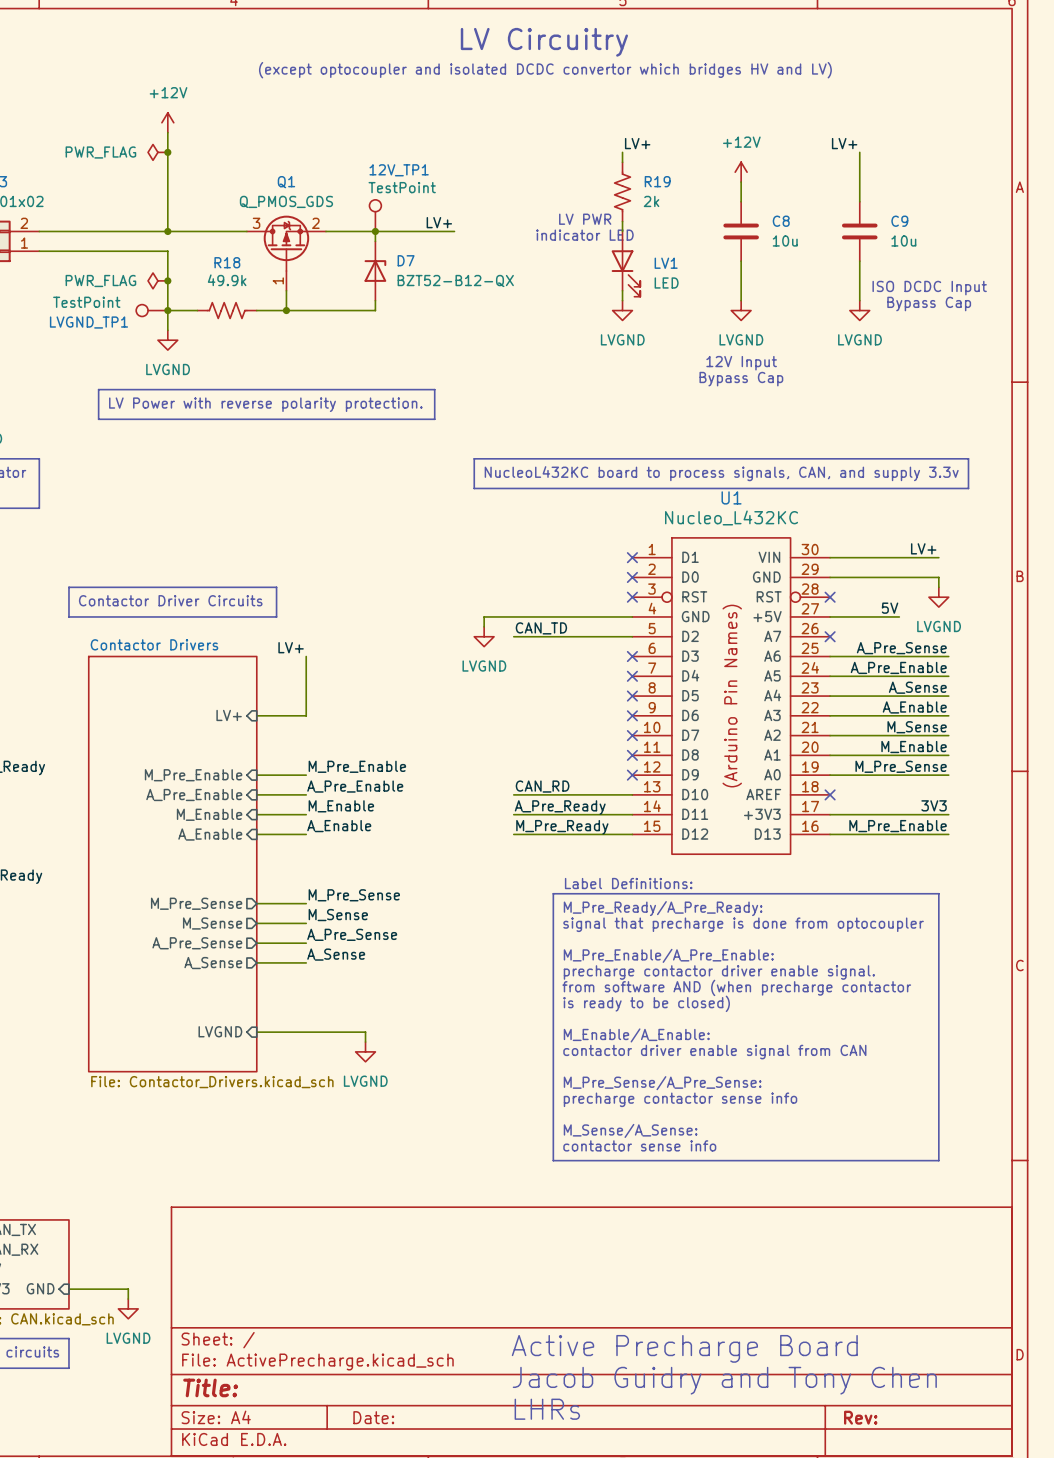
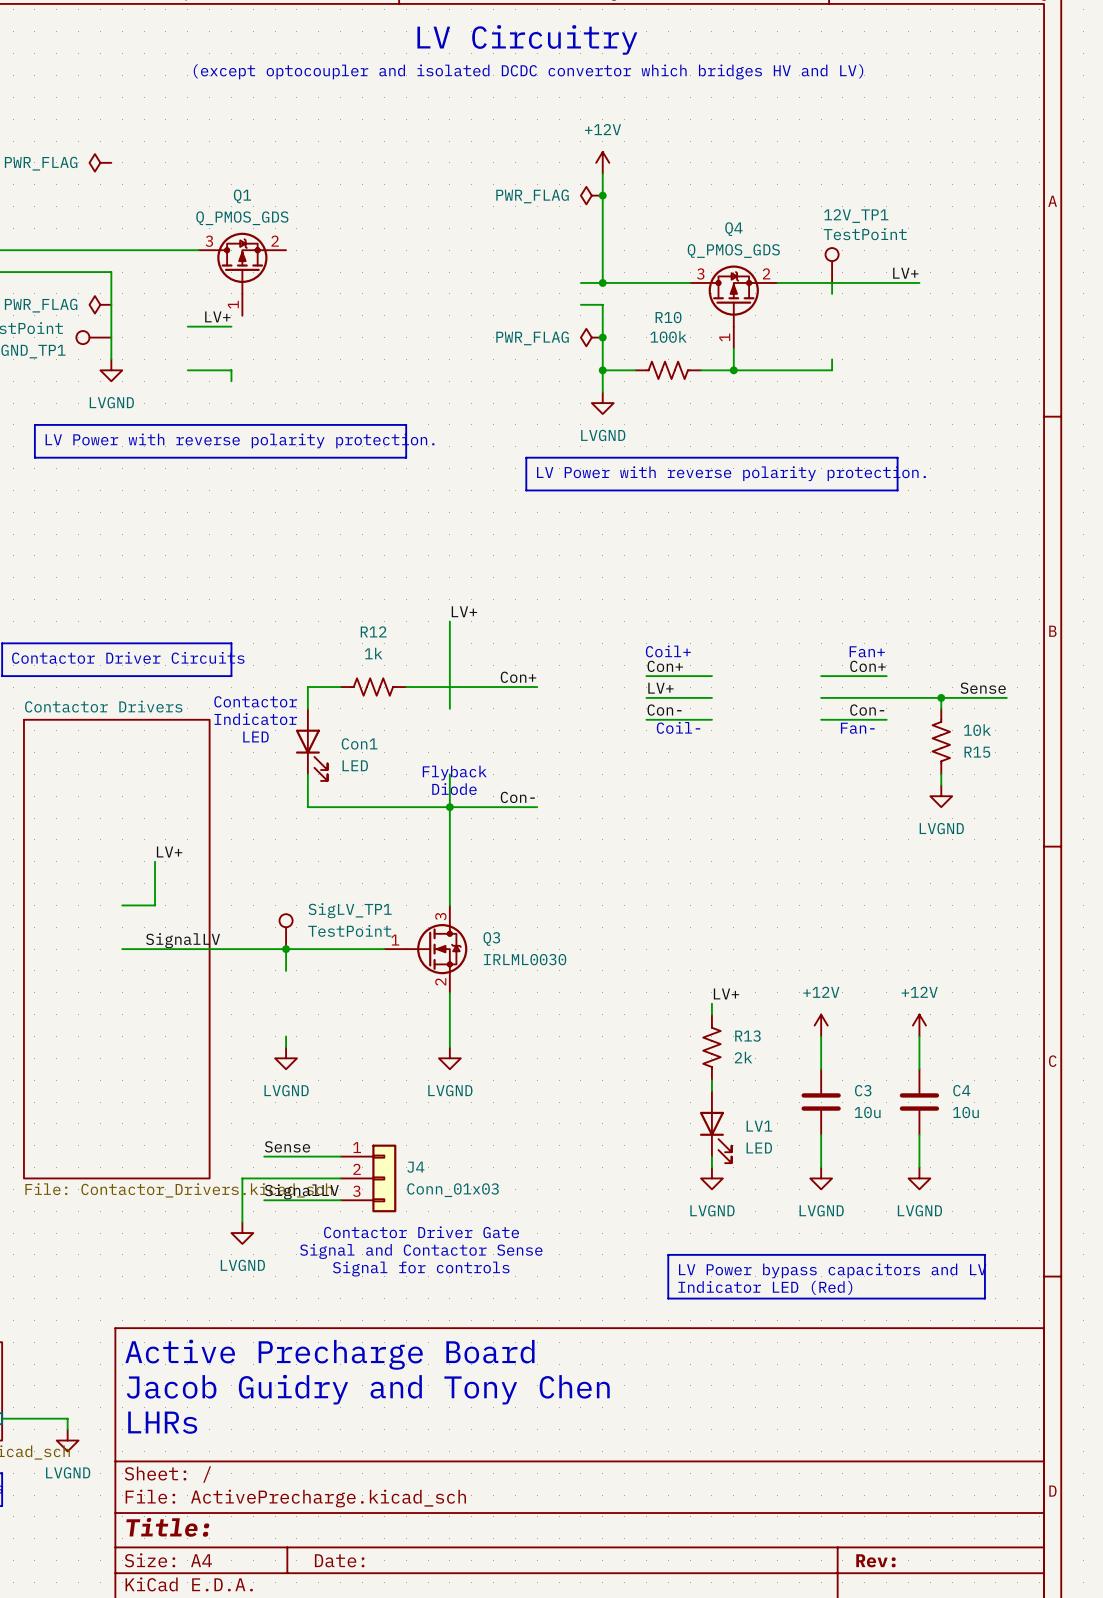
power symbol: +12V (167, 122) -> none
wire: (167, 132) (167, 231) -> none
label: LV+ (637, 143) -> none
label position: LV+ (844, 143) -> LV+ (905, 273)
junction: (167, 152) -> none
wire: (622, 152) (622, 162) -> none
wire: (859, 152) (859, 201) -> none
wire: none -> (602, 173) (602, 282)
power symbol position: +12V (741, 172) -> +12V (602, 162)
power symbol: none -> PWR_FLAG (591, 195)
junction: none -> (602, 195)
wire: (741, 182) (741, 201) -> (733, 348) (733, 370)
R19: 2k (622, 191) -> none
12V_TP1 position: (375, 215) -> (832, 265)
text: LV PWR (585, 219) -> none
wire: (622, 221) (622, 231) -> none
label: LV+ (439, 222) -> none
junction: (167, 231) -> none
wire: (325, 231) (454, 231) -> none
wire: (375, 231) (375, 241) -> none
junction: (375, 231) -> none
C8: 10u (741, 231) -> none
C9: 10u (859, 231) -> none
text: indicator LED (584, 235) -> none
wire: none -> (580, 282) (690, 282)
junction: none -> (602, 282)
wire: (741, 261) (741, 300) -> none
wire: none -> (777, 282) (919, 282)
wire: none -> (832, 282) (832, 293)
wire: (859, 261) (859, 300) -> none
LV1 position: (625, 264) -> (715, 1127)
D7: BZT52-B12-QX (375, 271) -> none
junction: (167, 280) -> none
wire: none -> (580, 304) (602, 304) (602, 392)
Q4: none -> Q_PMOS_GDS (733, 307)
text: ISO DCDC Input (929, 288) -> none
wire: (286, 290) (286, 310) -> none
wire: (622, 290) (622, 300) -> none
label: none -> LV+ (217, 316)
wire: none -> (187, 326) (231, 326)
wire: (375, 300) (375, 310) (256, 310) -> none
text: Bypass Cap (929, 304) -> none
wire: (167, 310) (197, 310) -> none
junction: (167, 310) -> none
R18: 49.9k (227, 310) -> none
junction: (286, 310) -> none
power symbol: none -> PWR_FLAG (591, 337)
junction: none -> (602, 337)
power symbol position: LVGND (622, 310) -> LVGND (602, 403)
power symbol: LVGND (741, 310) -> none
power symbol: LVGND (859, 310) -> none
wire: none -> (832, 359) (832, 370) (701, 370)
wire: none -> (187, 370) (231, 370) (231, 381)
wire: none -> (602, 370) (635, 370)
junction: none -> (602, 370)
R10: none -> 100k (668, 370)
junction: none -> (733, 370)
text: 12V Input (741, 363) -> none
text: Bypass Cap (741, 379) -> none
line: none -> (526, 457) (897, 457) (897, 490) (526, 490) (526, 457)
text: none -> LV Power with reverse polarity protection. (731, 473)
line: (474, 458) (968, 458) (968, 488) (474, 488) (474, 458) -> none
text: NucleoL432KC board to process signals, CAN, and supply 3.3v (721, 473) -> none
label: LV+ (923, 548) -> none
no-connect mark: (632, 557) -> none
wire: (830, 557) (938, 557) -> none
label: none -> LV+ (464, 611)
wire: none -> (449, 621) (449, 708)
no-connect mark: (632, 577) -> none
wire: (830, 577) (938, 577) (938, 587) -> none
text: none -> Coil+ (668, 651)
text: none -> Fan+ (867, 651)
no-connect mark: (632, 597) -> none
no-connect mark: (830, 597) -> none
power symbol position: LVGND (938, 597) -> LVGND (941, 796)
label: none -> Con+ (665, 666)
label: none -> Con+ (867, 666)
label: 5V (890, 608) -> none
wire: (632, 616) (484, 616) (484, 626) -> none
wire: none -> (646, 676) (711, 676)
wire: (869, 616) (899, 616) -> none
label: none -> Con+ (518, 677)
wire: none -> (340, 687) (307, 687) (307, 708)
R12: none -> 1k (373, 687)
label: none -> LV+ (660, 688)
label: CAN_TD (541, 628) -> none
power symbol: LVGND (484, 636) -> none
wire: (513, 636) (632, 636) -> (406, 687) (537, 687)
wire: none -> (646, 697) (711, 697)
wire: none -> (821, 697) (1006, 697)
no-connect mark: (830, 636) -> none
wire: none -> (941, 697) (941, 708)
junction: none -> (941, 697)
text: none -> Contactor (255, 701)
label: LV+ (291, 647) -> none
label: none -> Con- (664, 710)
label: none -> Con- (867, 710)
label: A_Pre_Sense (901, 648) -> Sense (983, 688)
text: none -> Indicator (255, 719)
wire: (306, 656) (306, 715) (256, 715) -> none
no-connect mark: (632, 656) -> none
wire: none -> (646, 719) (711, 719)
wire: (869, 656) (948, 656) -> none
text: none -> Coil- (678, 727)
text: none -> Fan- (857, 728)
label: A_Pre_Enable (898, 667) -> none
text: none -> LED (255, 736)
no-connect mark: (632, 676) -> none
wire: (830, 676) (948, 676) -> none
R15: none -> 10k (941, 741)
Con1: none -> LED (311, 744)
label: A_Sense (917, 687) -> none
no-connect mark: (632, 696) -> none
U1: Nucleo_L432KC (731, 696) -> none
wire: (830, 696) (948, 696) -> none
wire: none -> (307, 774) (307, 807) (537, 807)
wire: none -> (449, 774) (449, 905)
text: none -> Flyback (454, 773)
wire: none -> (941, 774) (941, 785)
label: A_Enable (914, 707) -> none
sheet pin: LV+ (229, 715) -> none
no-connect mark: (632, 715) -> none
wire: (830, 715) (948, 715) -> none
text: none -> Diode (454, 789)
label: none -> Con- (517, 797)
label: M_Sense (917, 727) -> none
junction: none -> (449, 807)
no-connect mark: (632, 735) -> none
wire: (830, 735) (948, 735) -> none
label: M_Enable (914, 747) -> none
no-connect mark: (632, 755) -> none
wire: (830, 755) (948, 755) -> none
label: M_Pre_Enable (357, 766) -> none
label: M_Pre_Sense (901, 766) -> none
sheet pin: M_Pre_Enable (193, 775) -> none
wire: (256, 775) (306, 775) -> none
no-connect mark: (632, 775) -> none
wire: (830, 775) (948, 775) -> none
label: none -> LV+ (169, 852)
wire: none -> (155, 861) (155, 905) (122, 905)
label: A_Pre_Enable (355, 786) -> none
label: CAN_RD (542, 786) -> none
wire: (256, 794) (306, 794) -> none
wire: (513, 794) (632, 794) -> none
no-connect mark: (830, 794) -> none
sheet pin: A_Pre_Enable (194, 795) -> none
label: 3V3 (934, 805) -> none
label: M_Enable (341, 806) -> none
label: A_Pre_Ready (560, 807) -> none
sheet pin: M_Enable (209, 814) -> none
wire: (256, 814) (306, 814) -> none
wire: (513, 814) (632, 814) -> none
wire: (830, 814) (948, 814) -> none
label: A_Enable (339, 826) -> none
label: M_Pre_Enable (898, 826) -> none
label: M_Pre_Ready (562, 827) -> none
sheet pin: A_Enable (210, 834) -> none
wire: (256, 834) (306, 834) -> none
wire: (513, 834) (632, 834) -> none
wire: (830, 834) (948, 834) -> none
SigLV_TP1: none -> TestPoint (286, 931)
label: none -> SignalLV (183, 940)
wire: none -> (122, 949) (384, 949)
wire: none -> (286, 949) (286, 970)
junction: none -> (286, 949)
Q3: none -> IRLML0030 (425, 949)
text: Label Definitions: (628, 883) -> none
line: (553, 893) (938, 893) (938, 1160) (553, 1160) (553, 893) -> none
label: M_Pre_Sense (354, 895) -> none
sheet pin: M_Pre_Sense (196, 903) -> none
wire: (256, 903) (306, 903) -> none
wire: none -> (449, 992) (449, 1047)
label: none -> LV+ (726, 993)
text: M_Pre_Ready/A_Pre_Ready: (663, 908) -> none
wire: none -> (711, 1003) (711, 1014)
label: M_Sense (338, 915) -> none
sheet pin: M_Sense (212, 923) -> none
wire: (256, 923) (306, 923) -> none
text: signal that precharge is done from optocoupler (743, 924) -> none
power symbol: none -> +12V (821, 1025)
power symbol: none -> +12V (919, 1025)
label: A_Pre_Sense (352, 934) -> none
sheet pin: A_Pre_Sense (197, 943) -> none
wire: (256, 943) (306, 943) -> none
wire: none -> (286, 1036) (286, 1047)
wire: none -> (821, 1036) (821, 1069)
wire: none -> (919, 1036) (919, 1069)
R13: none -> 2k (711, 1047)
label: A_Sense (336, 954) -> none
text: M_Pre_Enable/A_Pre_Enable: (668, 955) -> none
wire: (256, 962) (306, 962) -> none
power symbol: none -> LVGND (286, 1058)
power symbol: none -> LVGND (449, 1058)
sheet pin: A_Sense (213, 963) -> none
text: precharge contactor driver enable signal. (719, 972) -> none
wire: none -> (711, 1080) (711, 1091)
text: from software AND (when precharge contactor (736, 987) -> none
C3: none -> 10u (821, 1102)
C4: none -> 10u (919, 1102)
text: is ready to be closed) (646, 1003) -> none
sheet pin: LVGND (220, 1031) -> none
wire: (256, 1032) (365, 1032) (365, 1042) -> none
wire: none -> (821, 1134) (821, 1167)
wire: none -> (919, 1134) (919, 1167)
text: M_Enable/A_Enable: (636, 1035) -> none
label: none -> Sense (287, 1146)
wire: none -> (264, 1156) (340, 1156)
power symbol: LVGND (365, 1051) -> none
wire: none -> (711, 1156) (711, 1167)
text: contactor driver enable signal from CAN (714, 1052) -> none
wire: none -> (340, 1178) (242, 1178) (242, 1222)
J4: none -> Conn_01x03 (368, 1178)
power symbol: none -> LVGND (711, 1178)
power symbol: none -> LVGND (821, 1178)
power symbol: none -> LVGND (919, 1178)
text: M_Pre_Sense/A_Pre_Sense: (662, 1083) -> none
label: none -> SignalLV (301, 1191)
wire: none -> (264, 1200) (340, 1200)
text: precharge contactor sense info (680, 1099) -> none
text: none -> Contactor Driver Gate (421, 1232)
power symbol: none -> LVGND (242, 1233)
text: M_Sense/A_Sense: (630, 1130) -> none
text: none -> Signal and Contactor Sense (421, 1251)
line: none -> (668, 1254) (984, 1254) (984, 1298) (668, 1298) (668, 1254)
text: contactor sense info (639, 1145) -> none
text: none -> Signal for controls (421, 1268)
text: none -> LV Power bypass capacitors and LV (832, 1270)
text: none -> Indicator LED (Red) (765, 1287)
text: none -> Active Precharge Board (329, 1354)
text: none -> Jacob Guidry and Tony Chen (368, 1389)
text: none -> LHRs (162, 1422)
text: Active Precharge Board (684, 1348) -> none
text: Jacob Guidry and Tony Chen (724, 1380) -> none
text: LHRs (547, 1409) -> none

